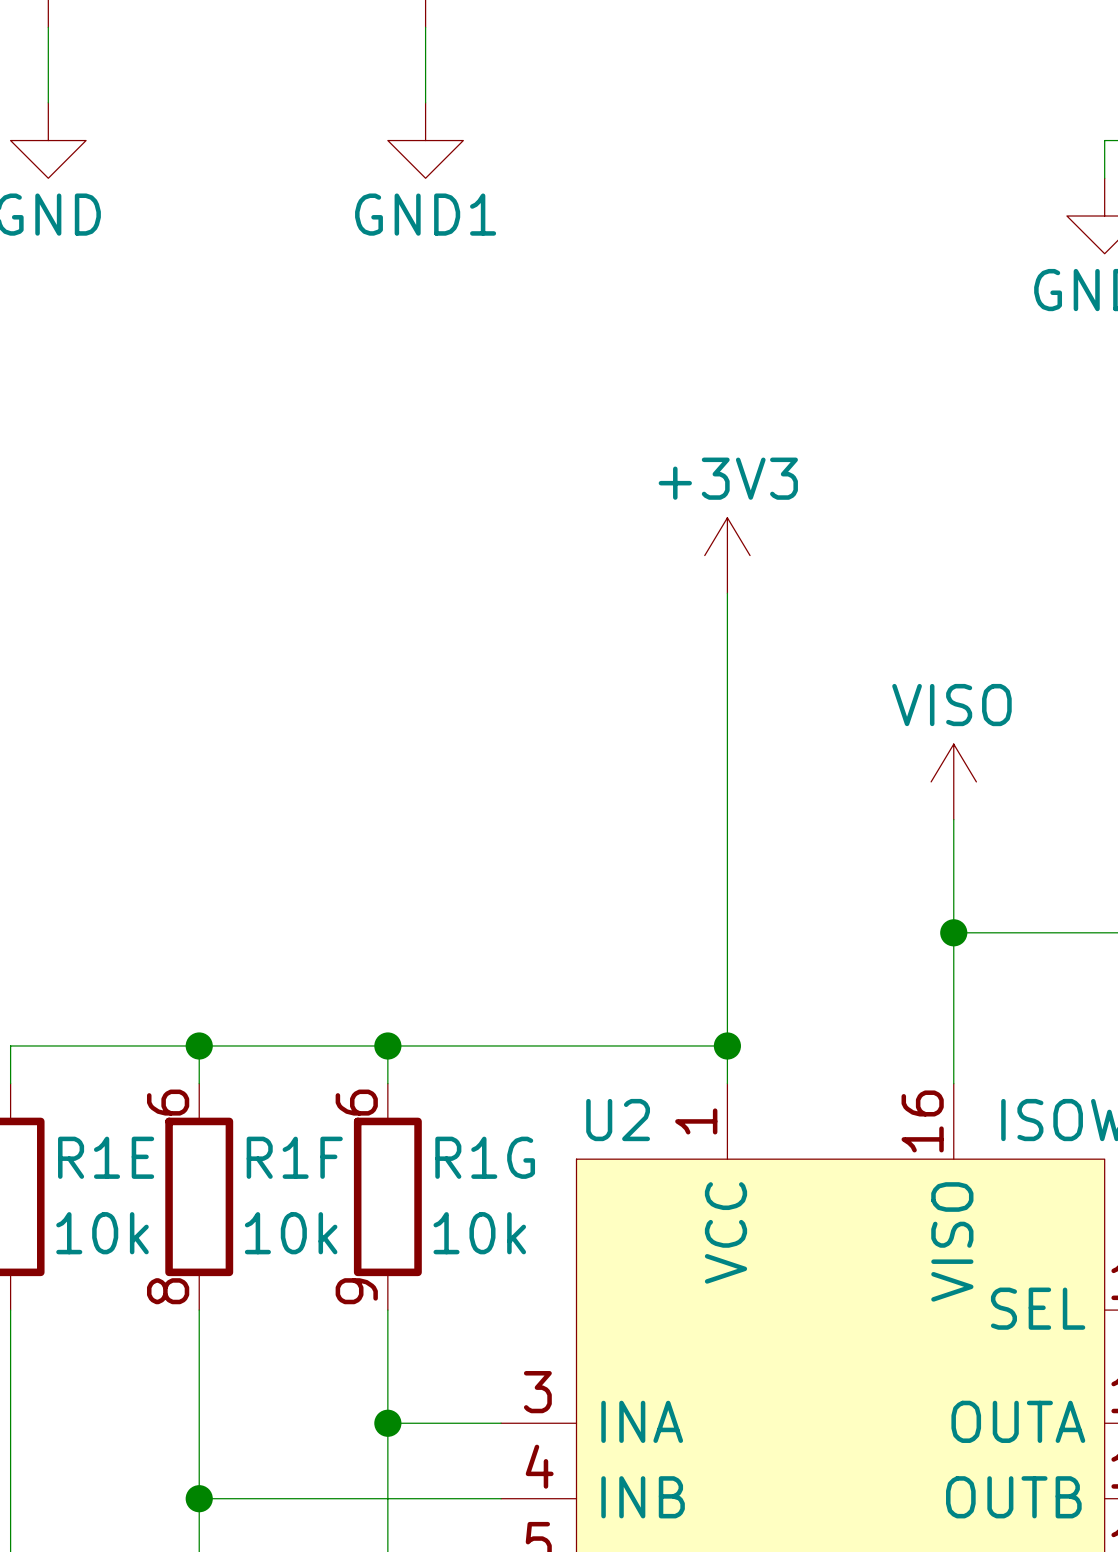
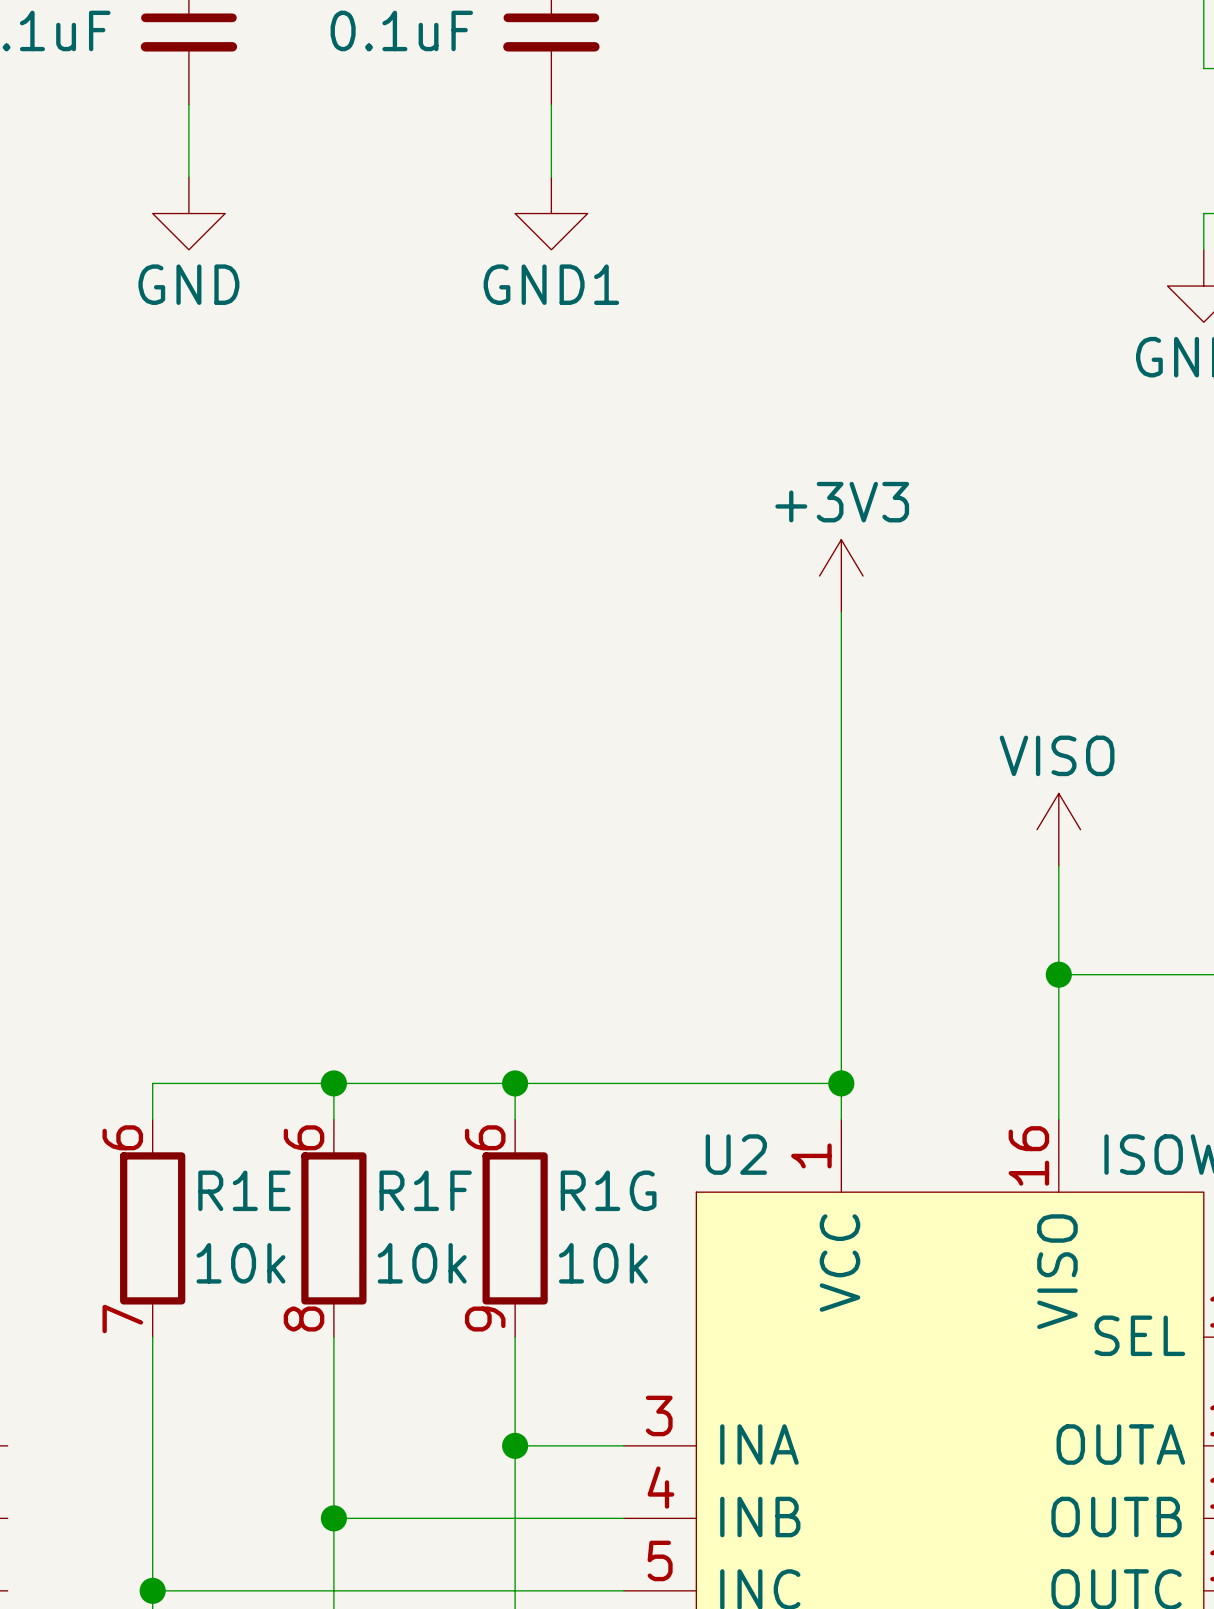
power symbol position: +3V3 (727, 555) -> +3V3 (841, 575)

